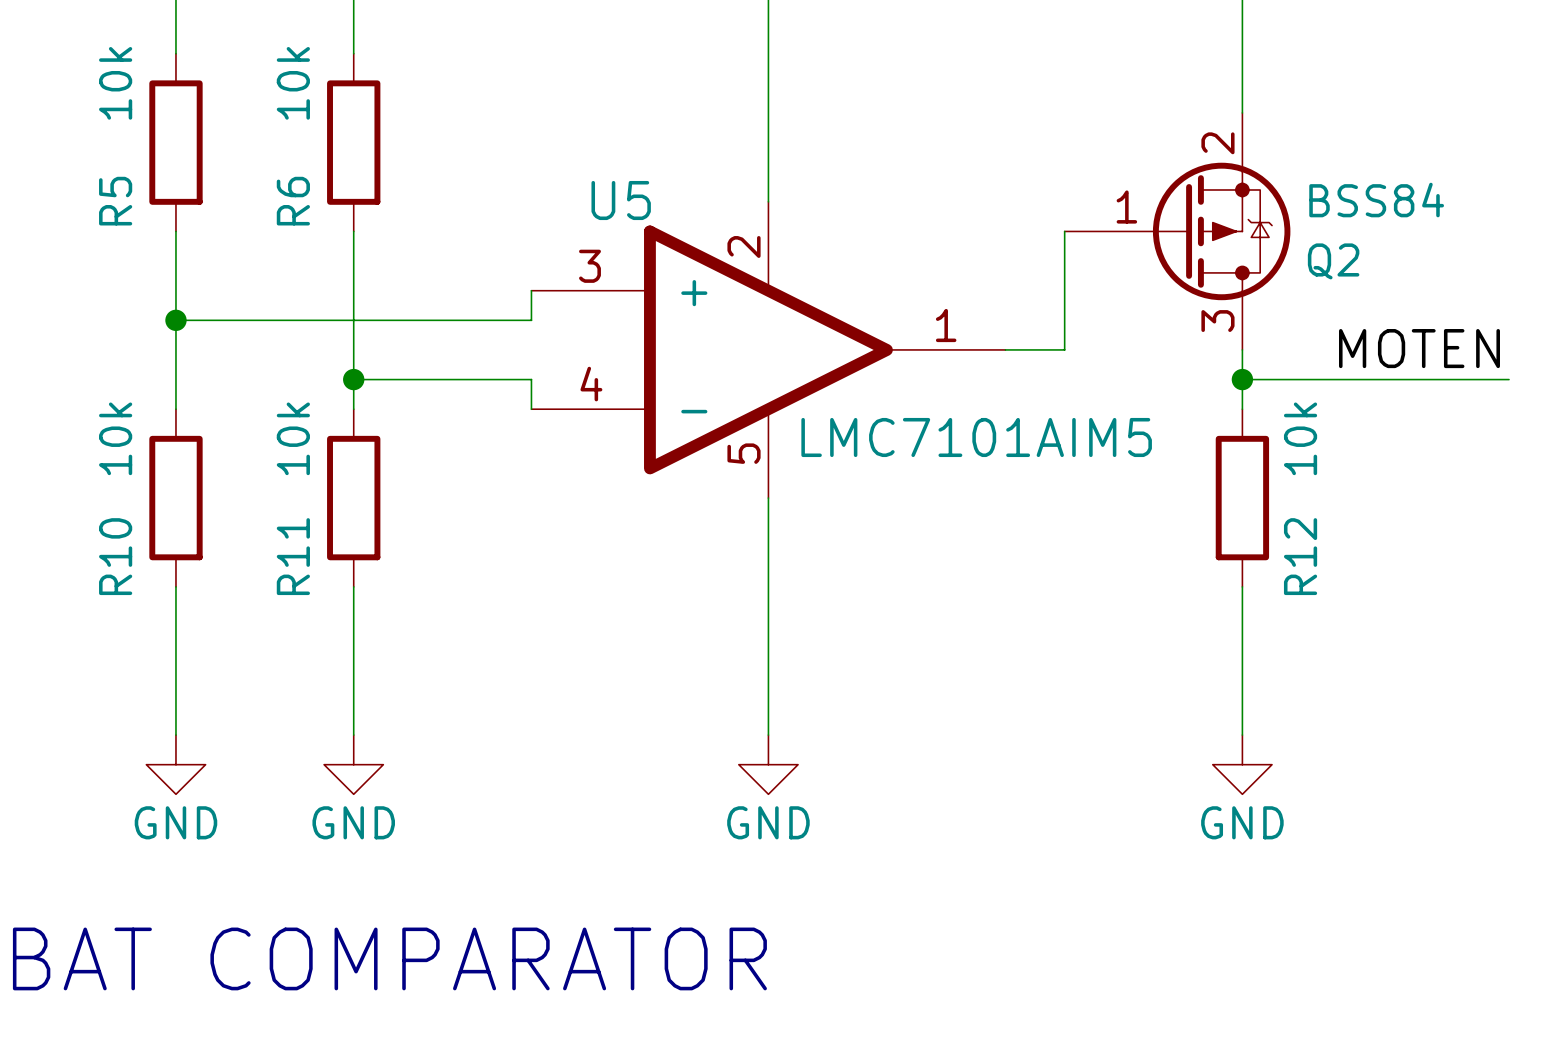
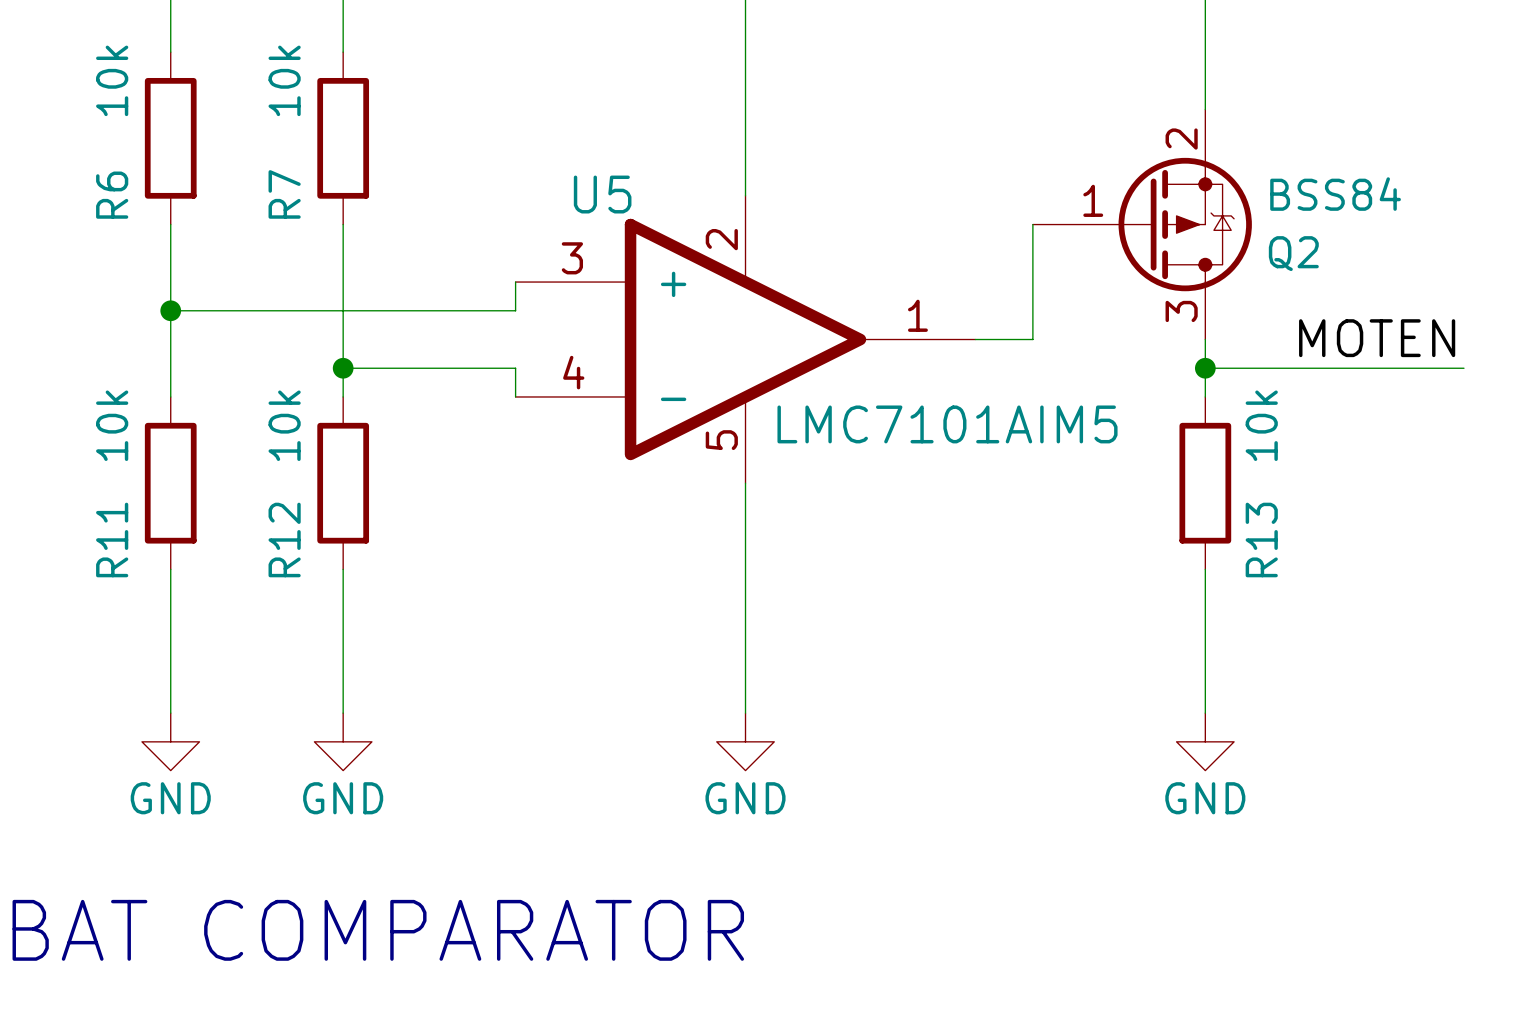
R5 name: R5 (115, 201) -> R6 (112, 195)
R6 name: R6 (293, 201) -> R7 (284, 194)
R10 name: R10 (115, 556) -> R11 (112, 540)
R11 name: R11 (293, 556) -> R12 (284, 540)
R12 name: R12 (1300, 556) -> R13 (1261, 540)

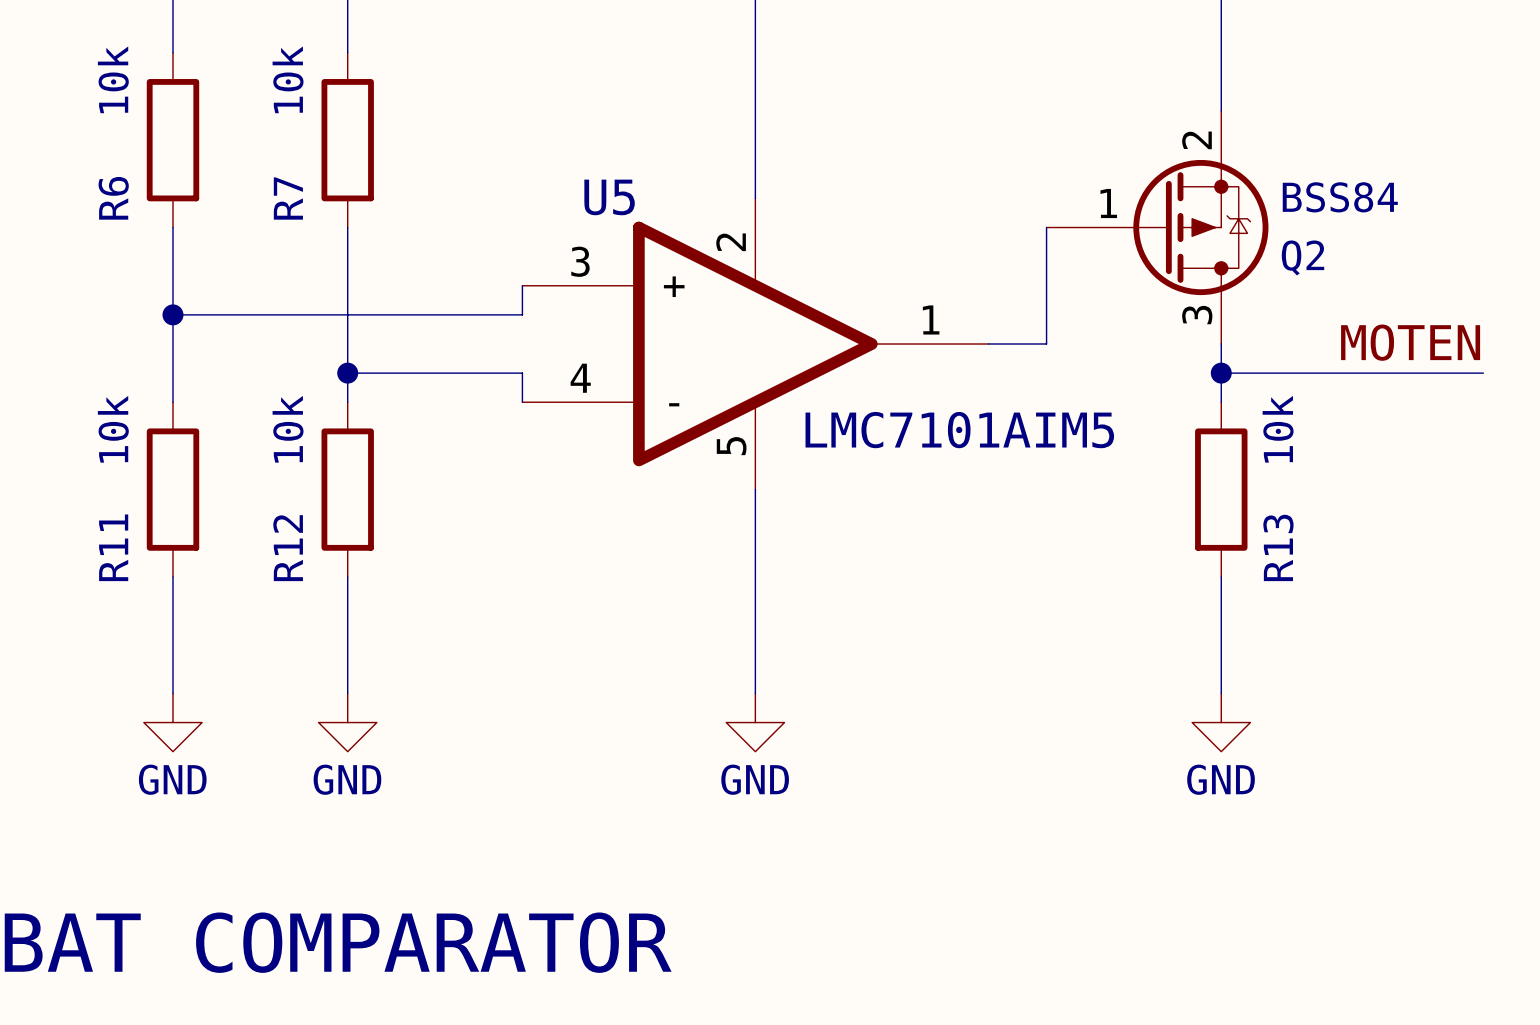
power symbol position: GND (170, 741) -> GND (172, 722)
power symbol position: GND (343, 741) -> GND (347, 722)
power symbol position: GND (745, 741) -> GND (755, 722)
power symbol position: GND (1205, 741) -> GND (1221, 722)

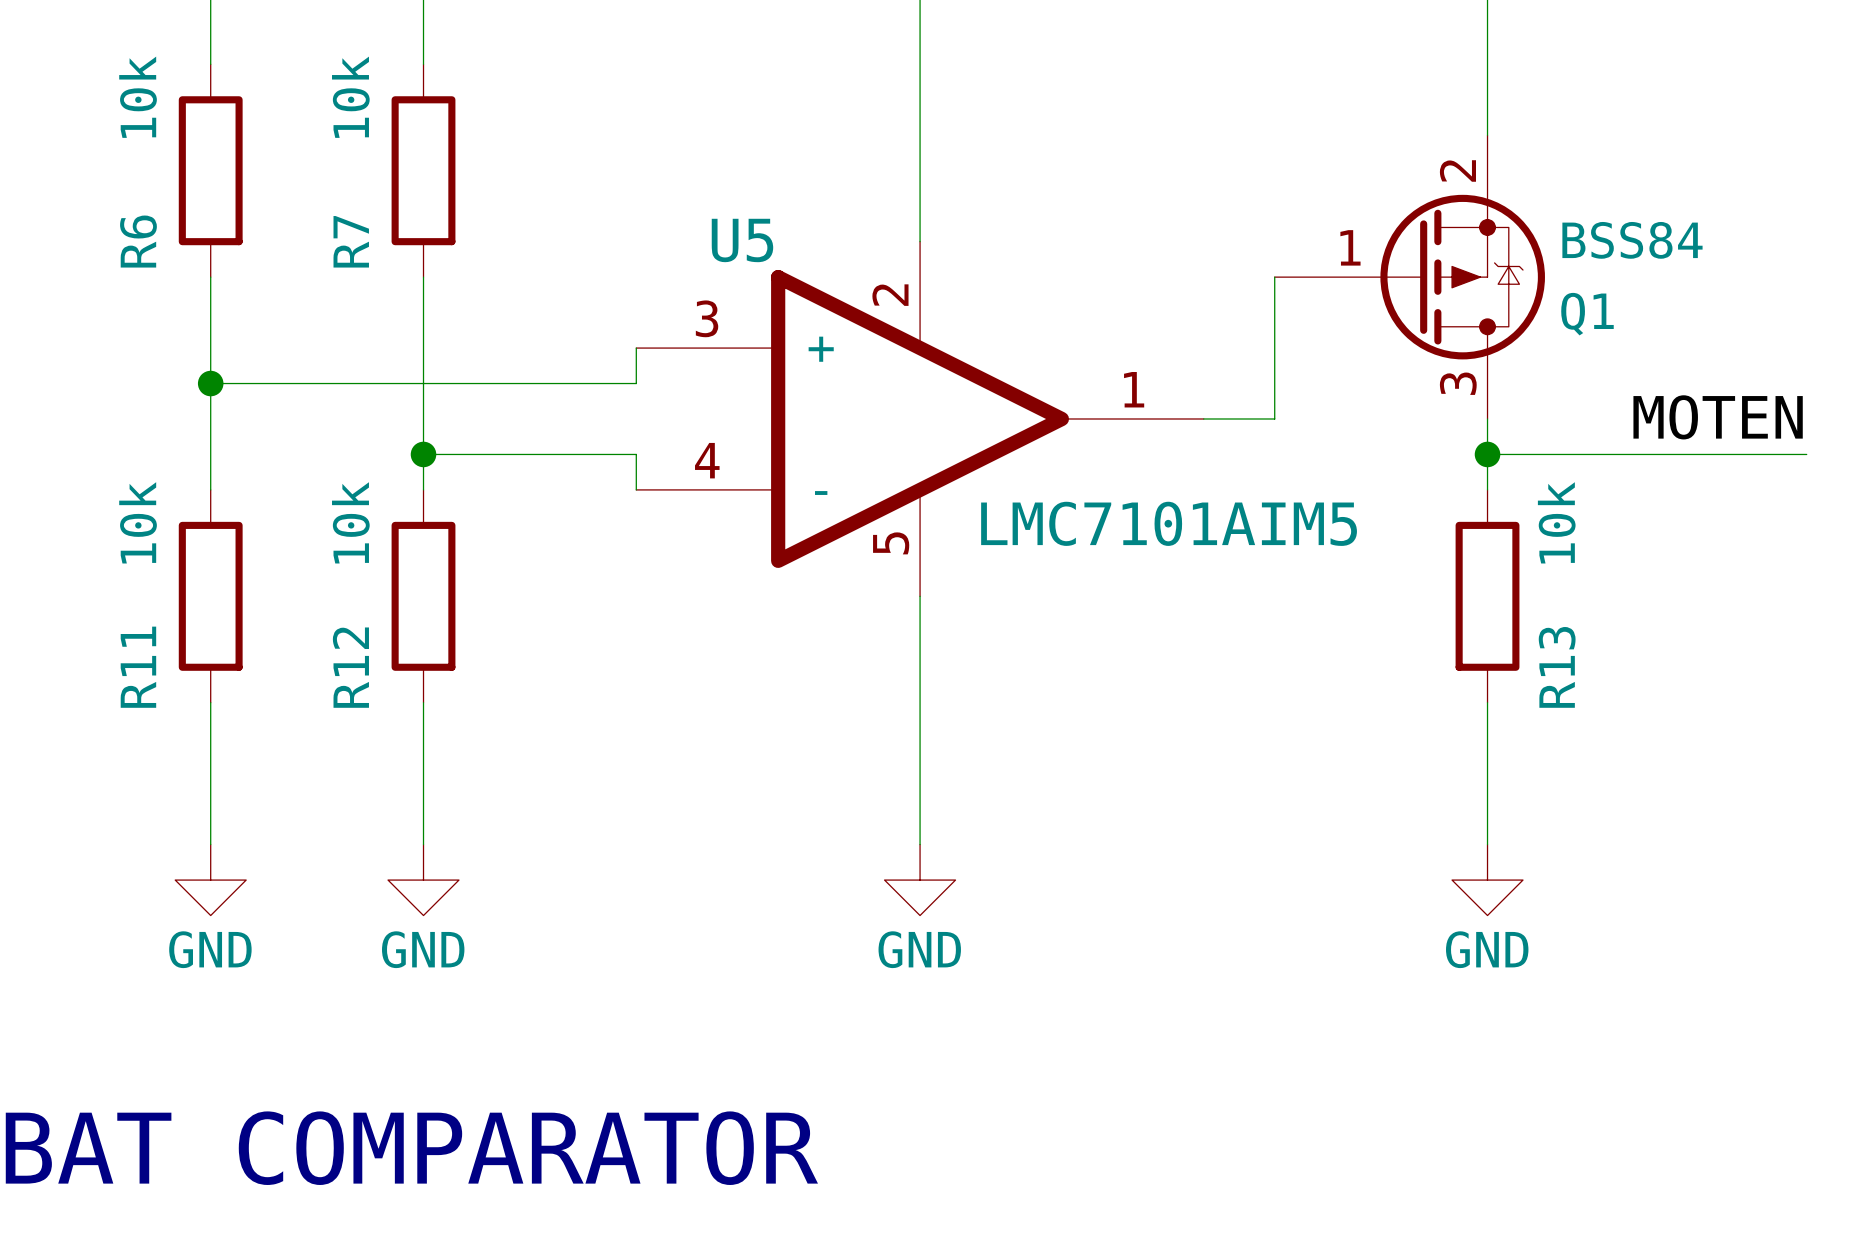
Q2 name: Q2 (1303, 257) -> Q1 (1587, 314)

